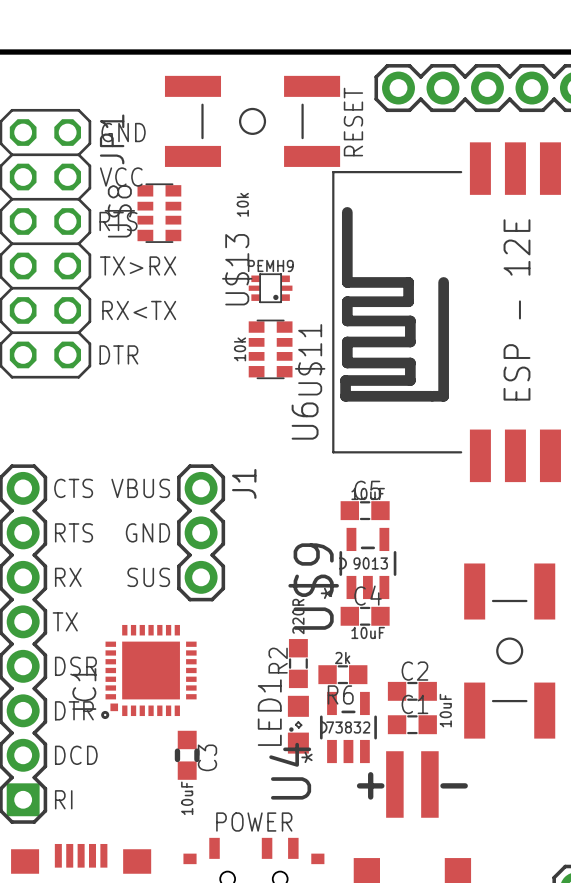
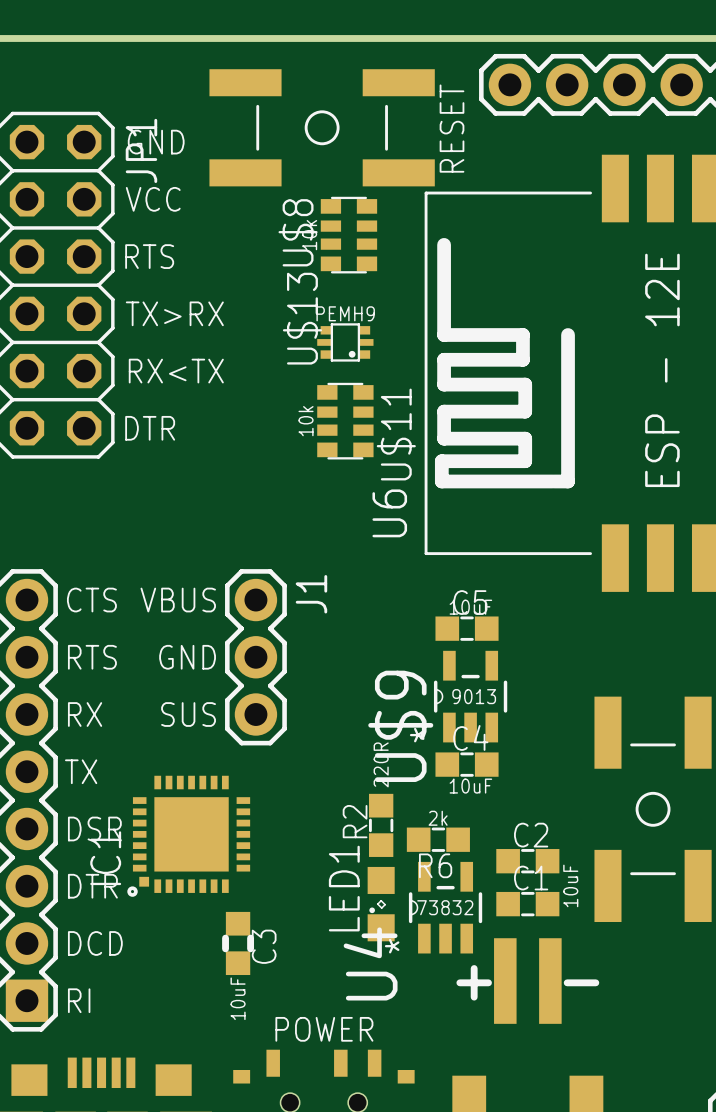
U$8 position: (159, 213) -> (348, 235)

